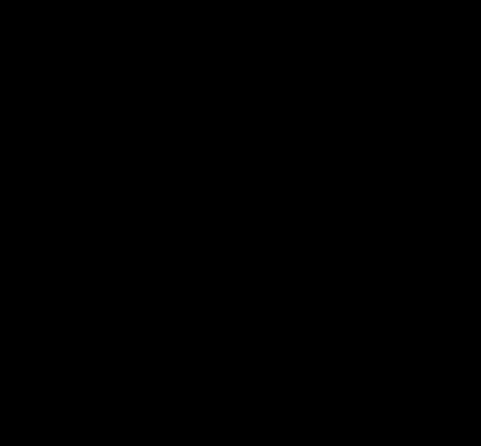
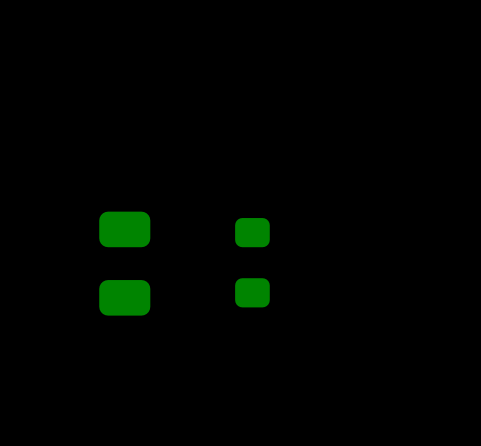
part: none -> (252, 262)
part: none -> (124, 263)

